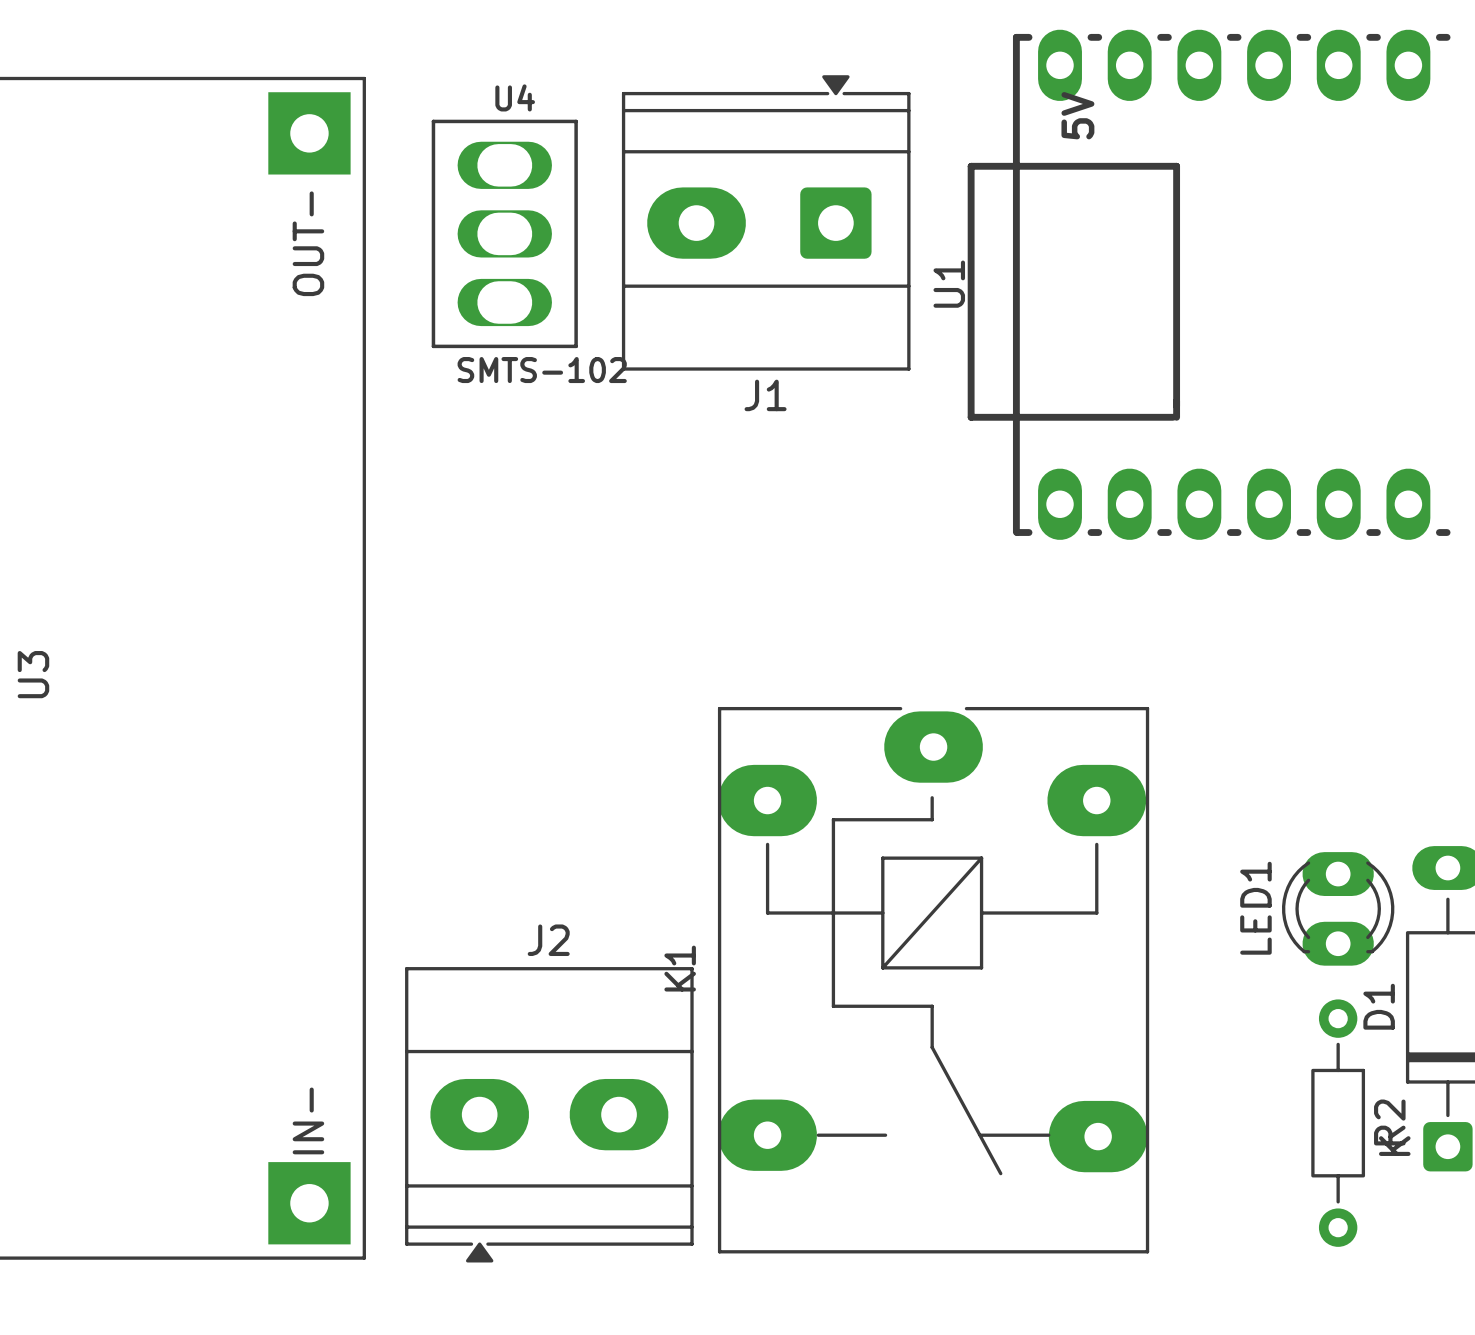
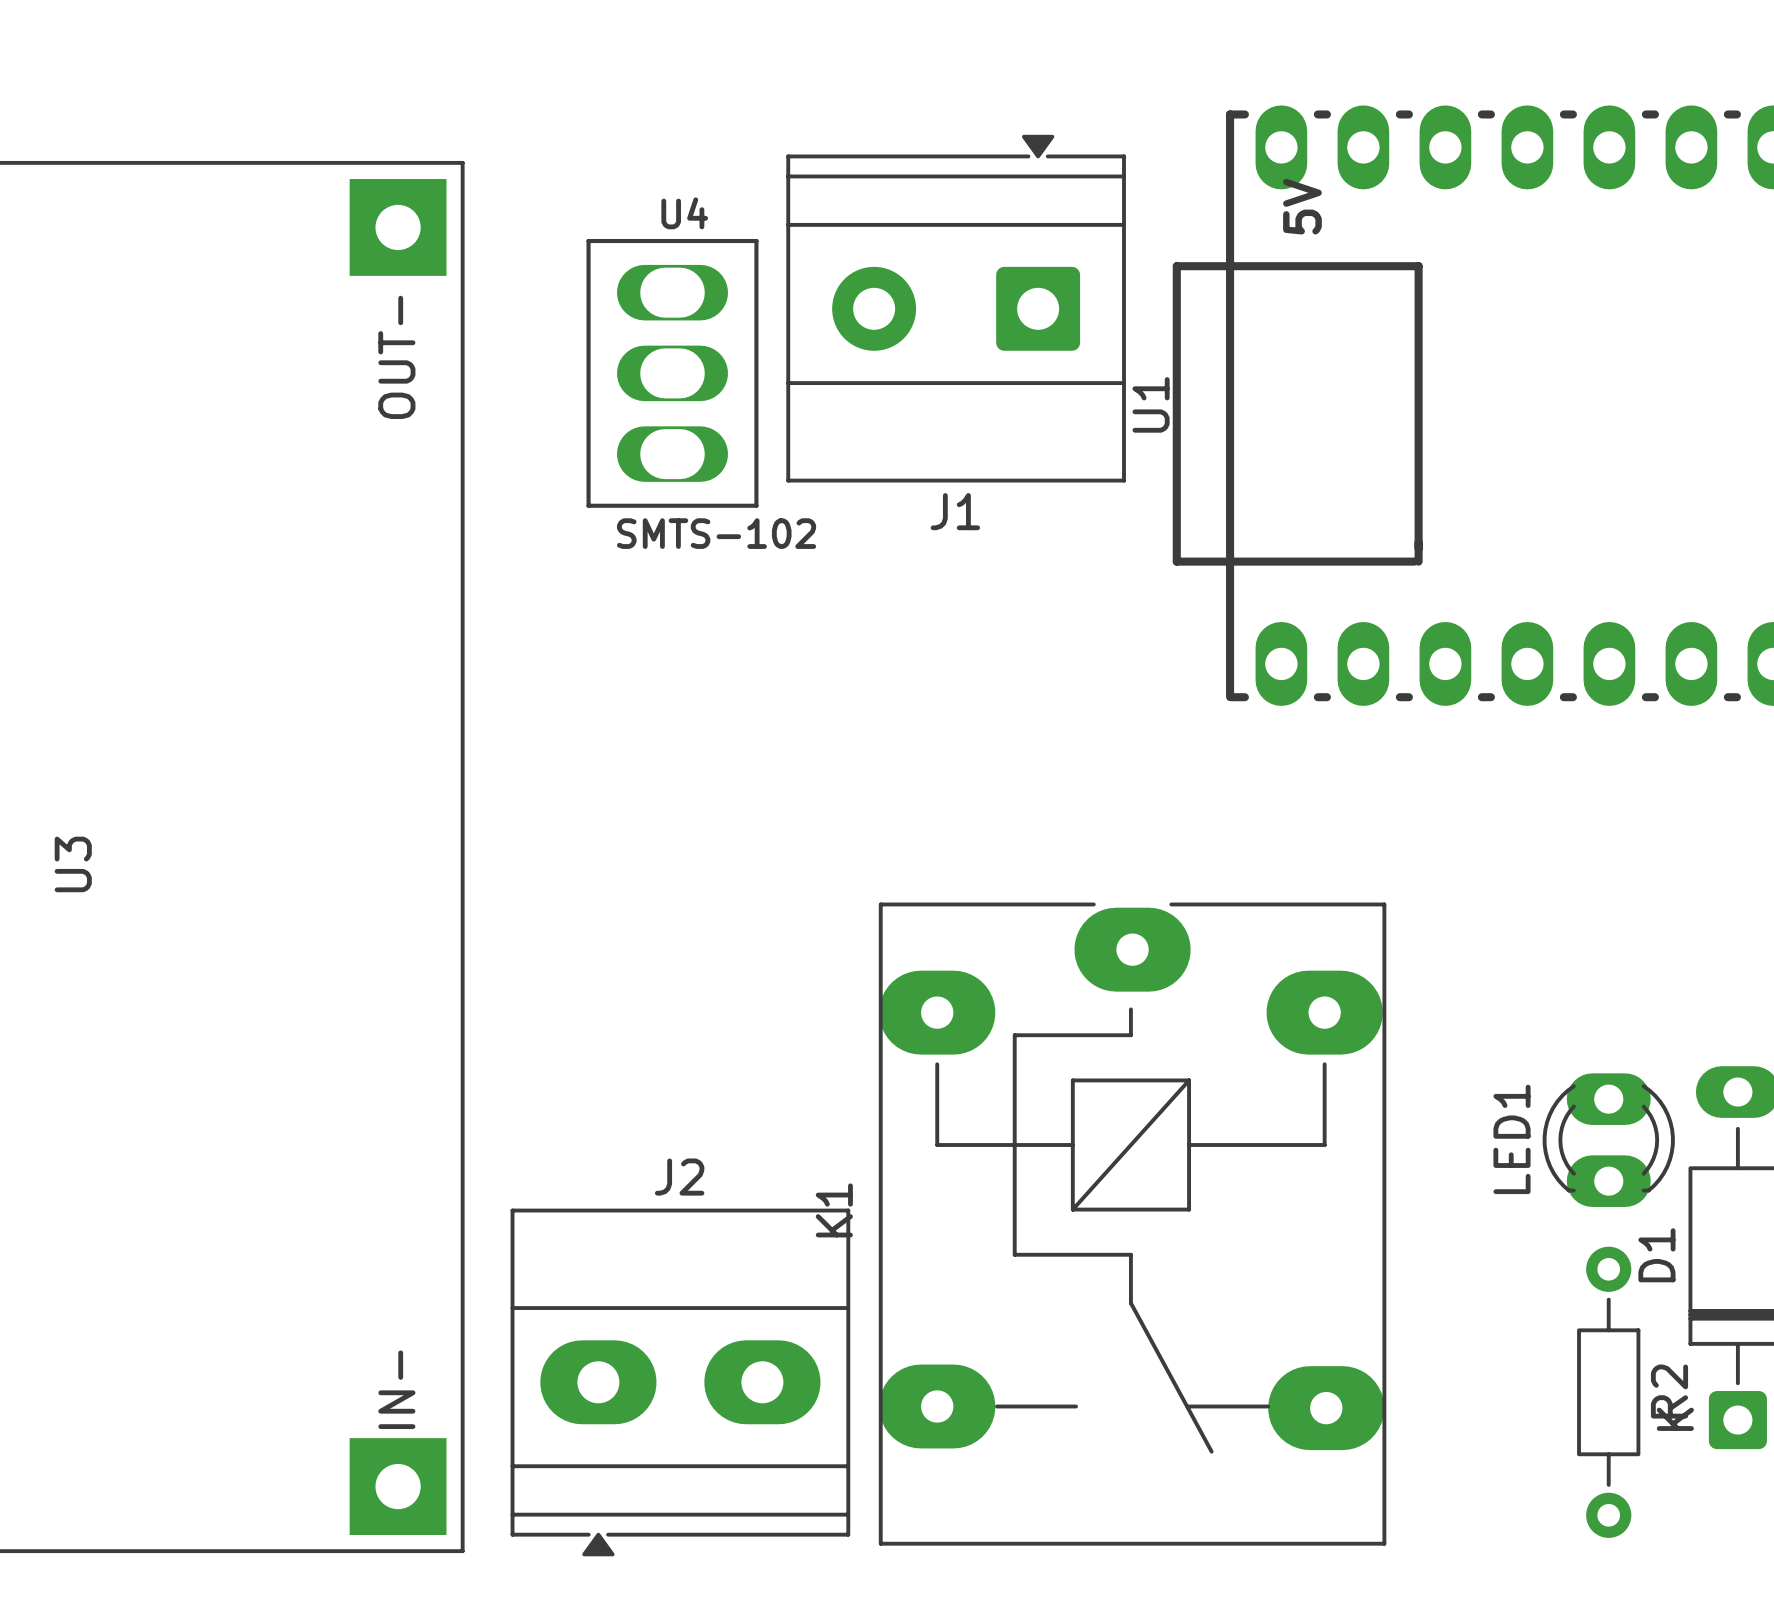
J1 footprint: [621, 75, 911, 371] -> [786, 134, 1126, 483]
U4 position: (504, 233) -> (672, 373)

